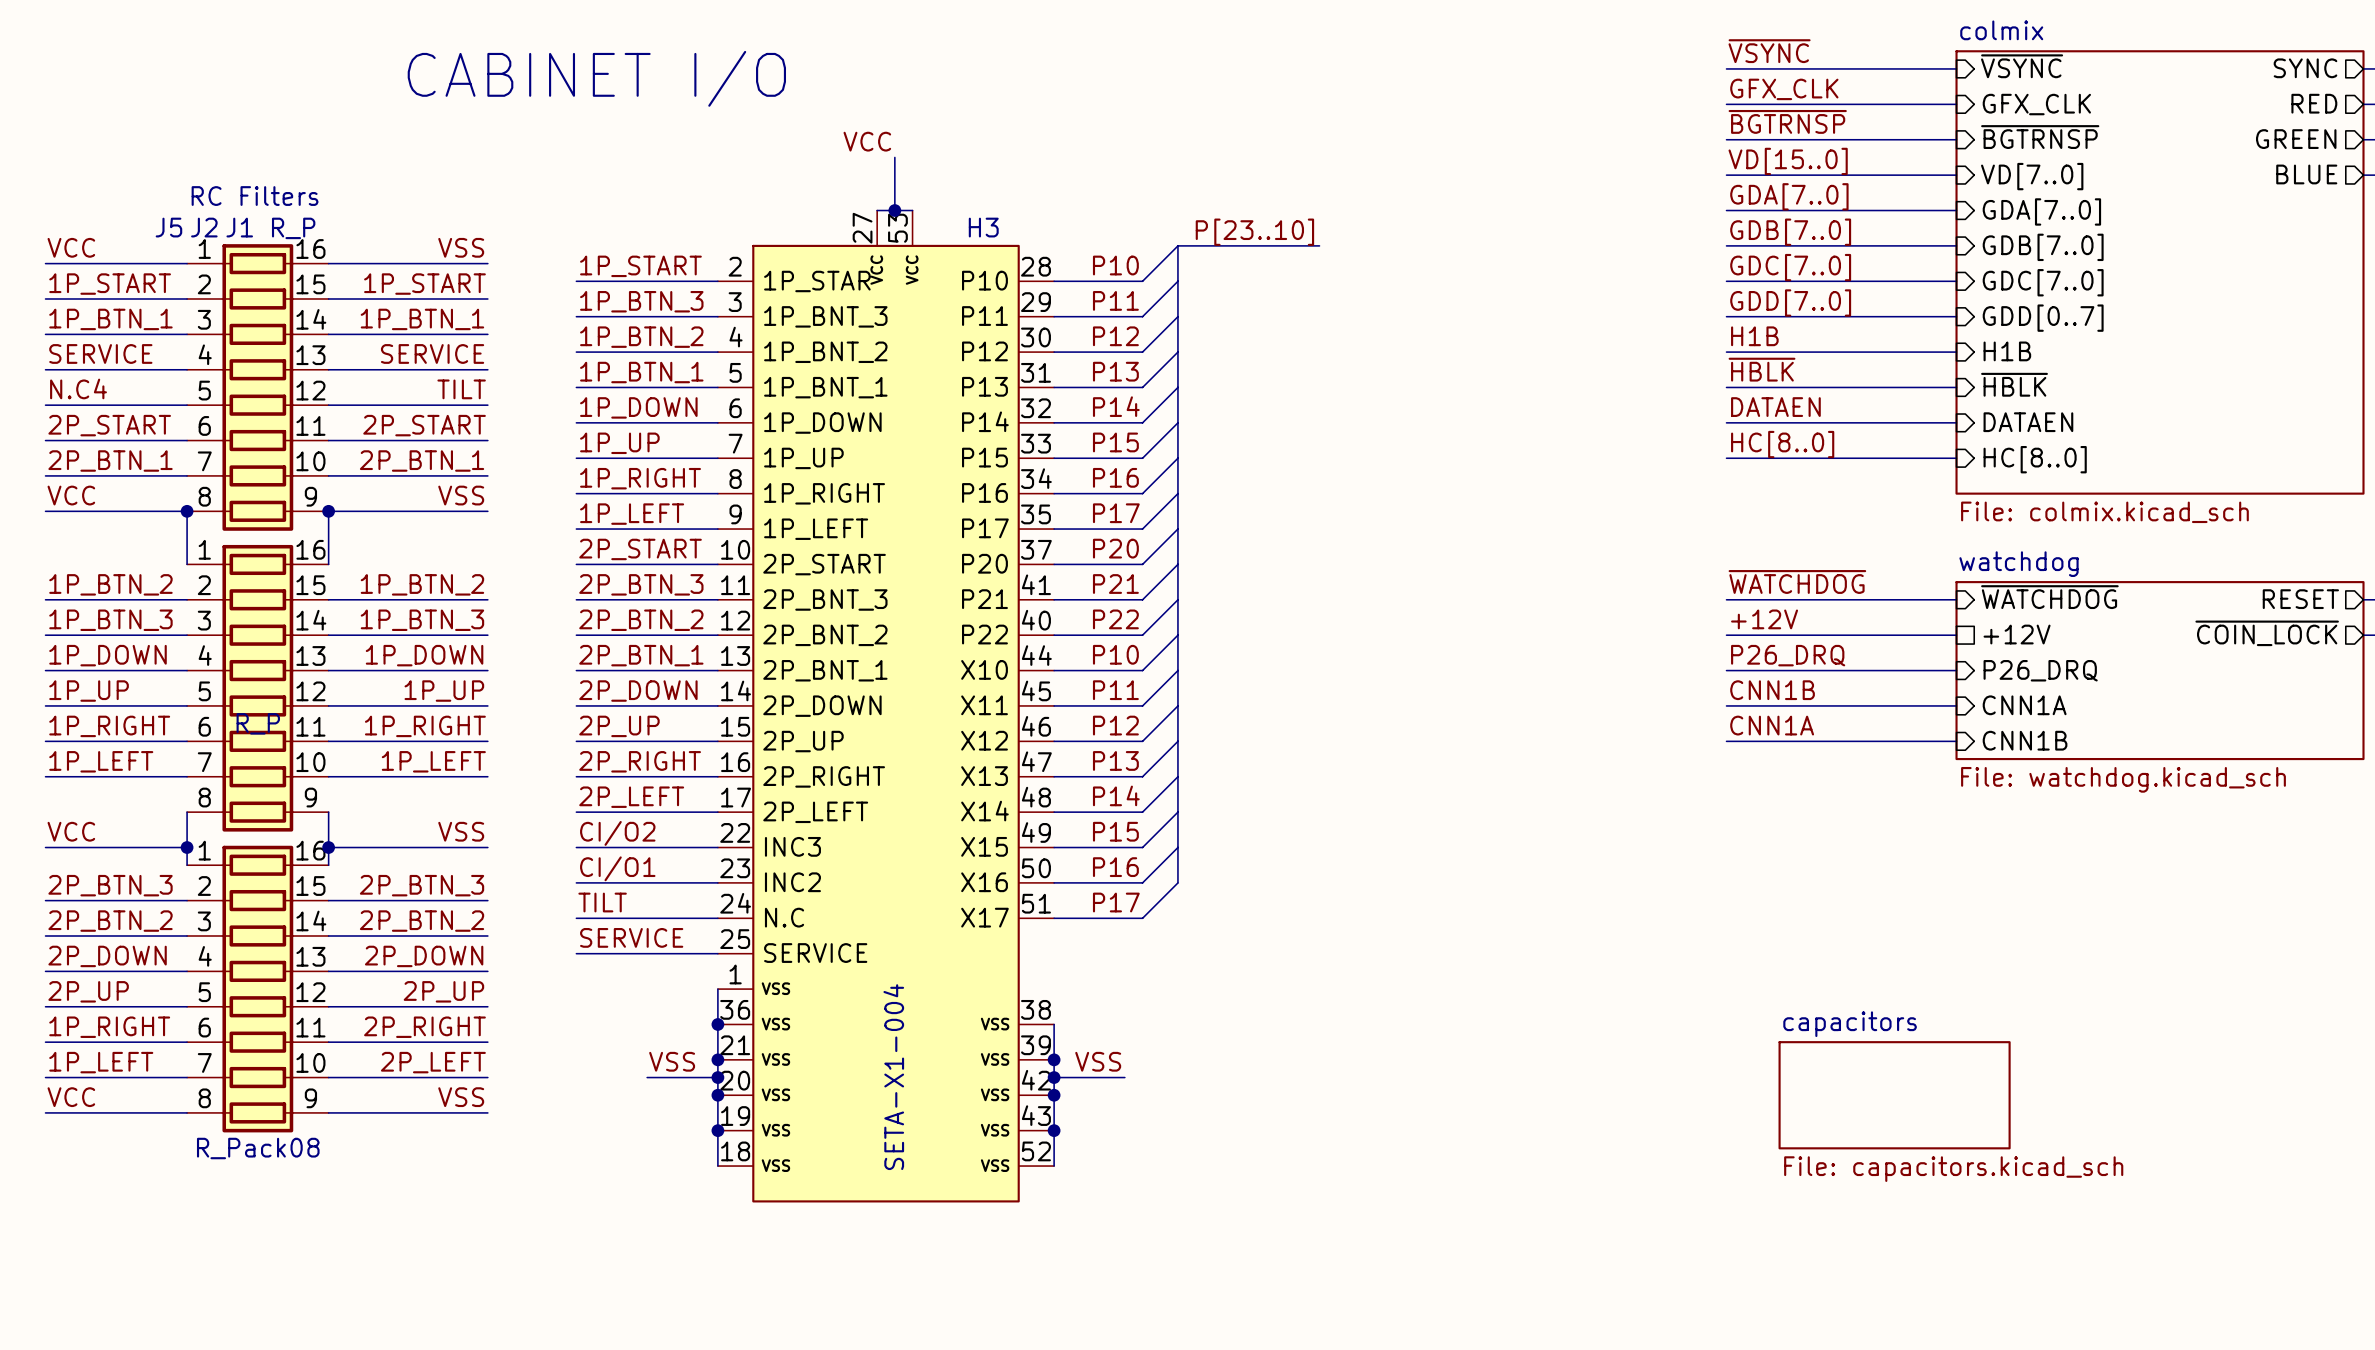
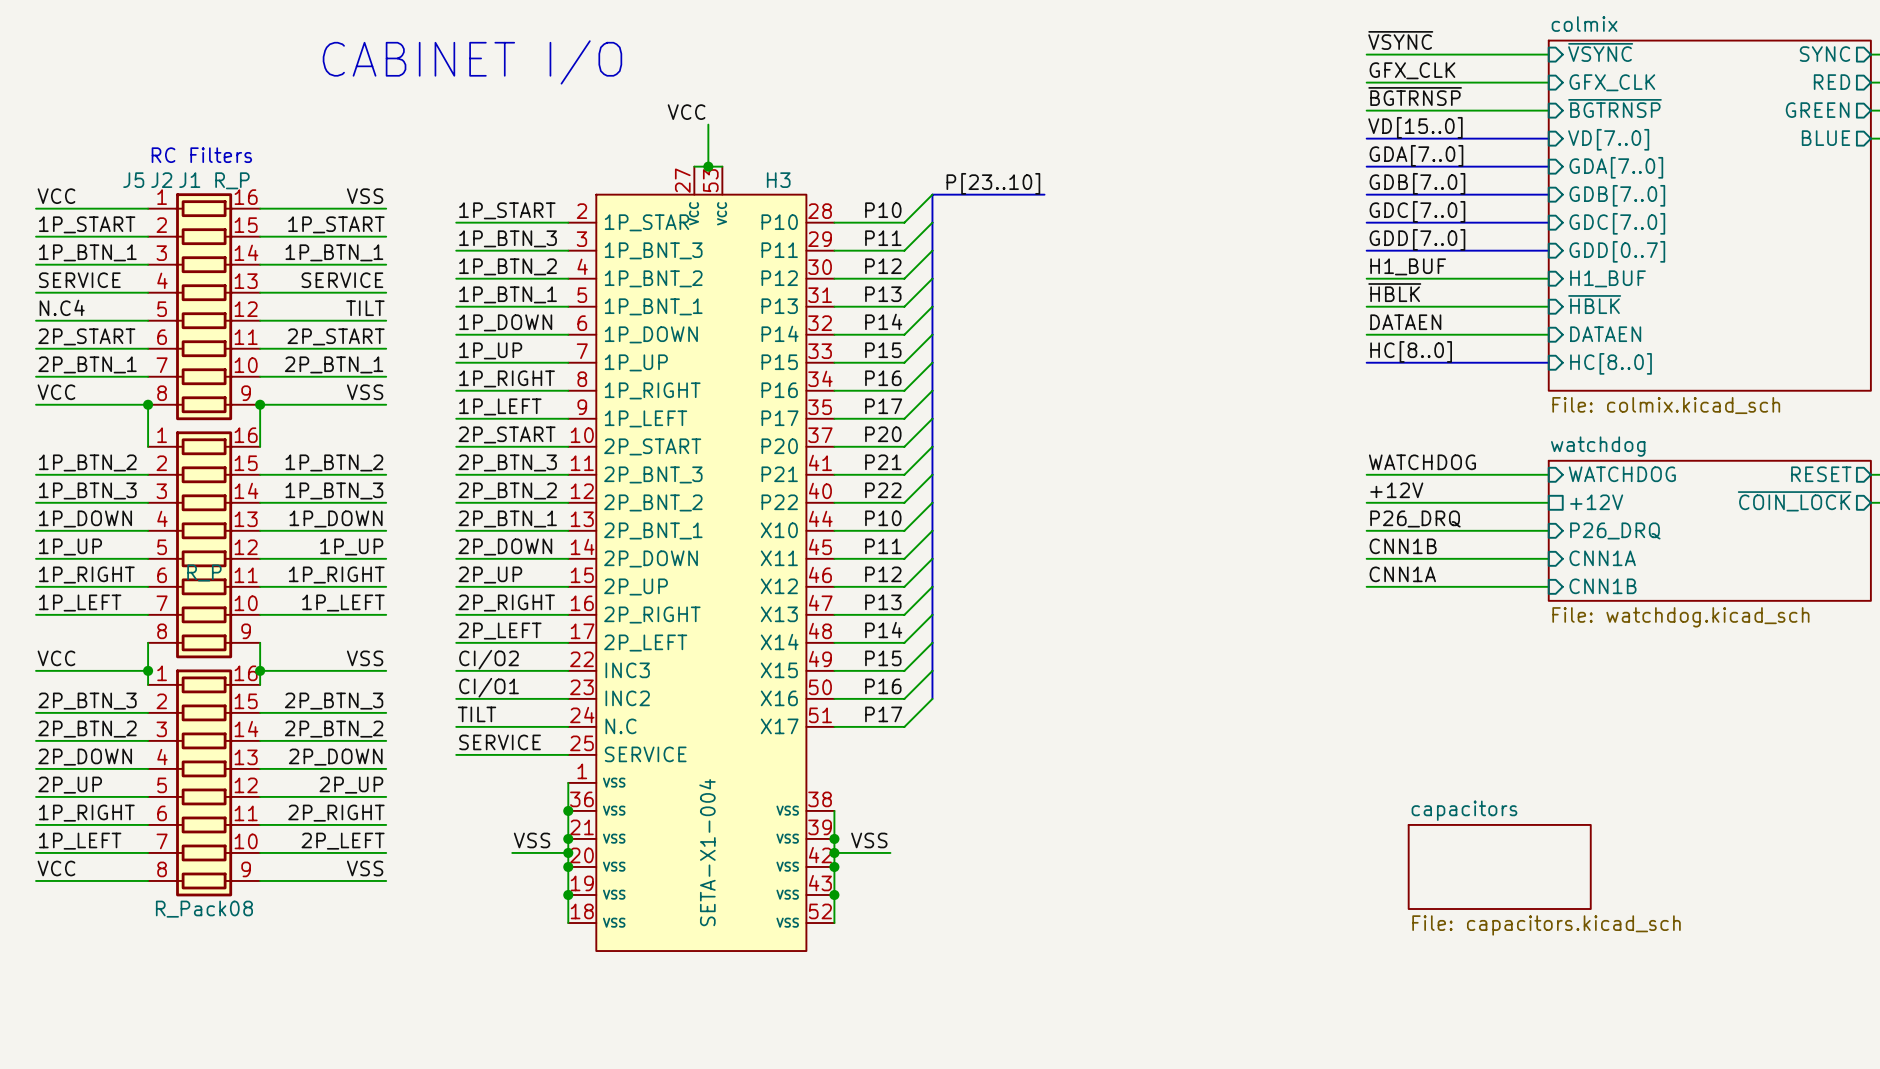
label: H1B (1754, 336) -> H1_BUF (1408, 266)
sheet pin: H1B (2007, 351) -> H1_BUF (1607, 278)
label: ~{WATCHDOG} (1797, 581) -> WATCHDOG (1422, 462)
sheet pin: ~{WATCHDOG} (2049, 597) -> WATCHDOG (1622, 474)

